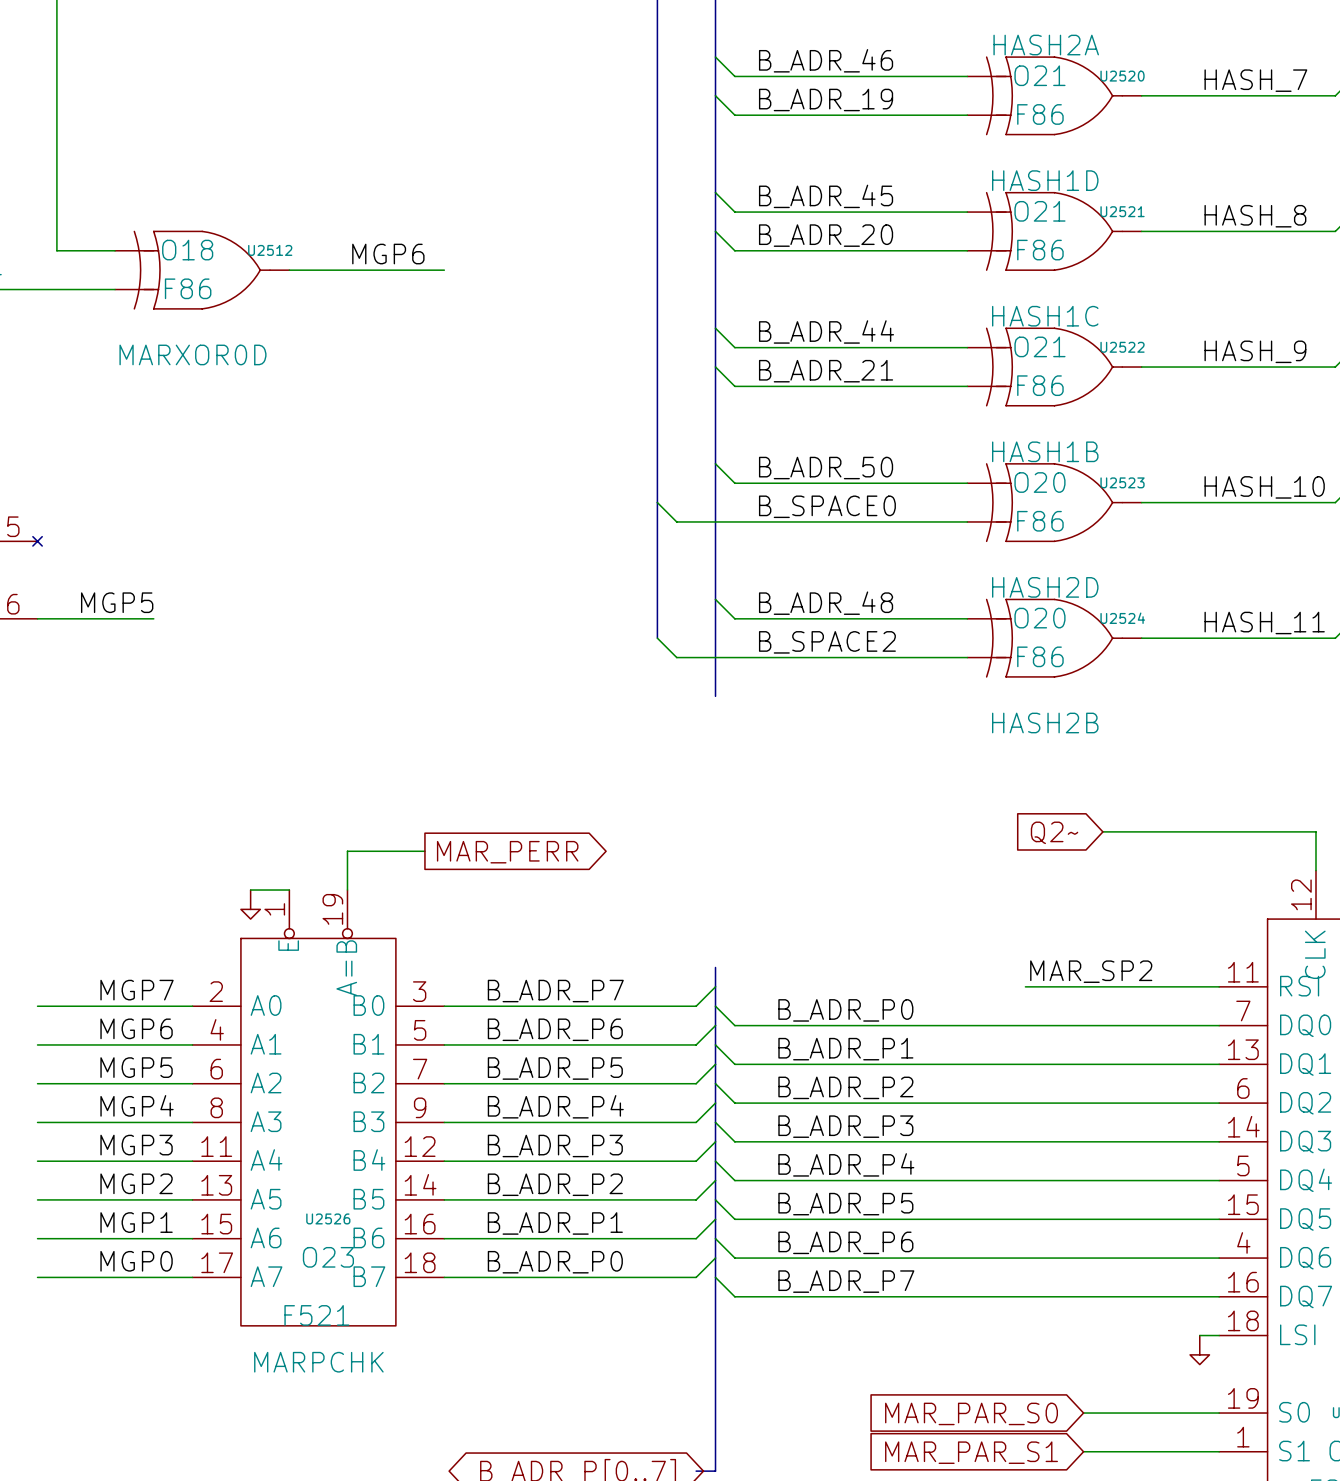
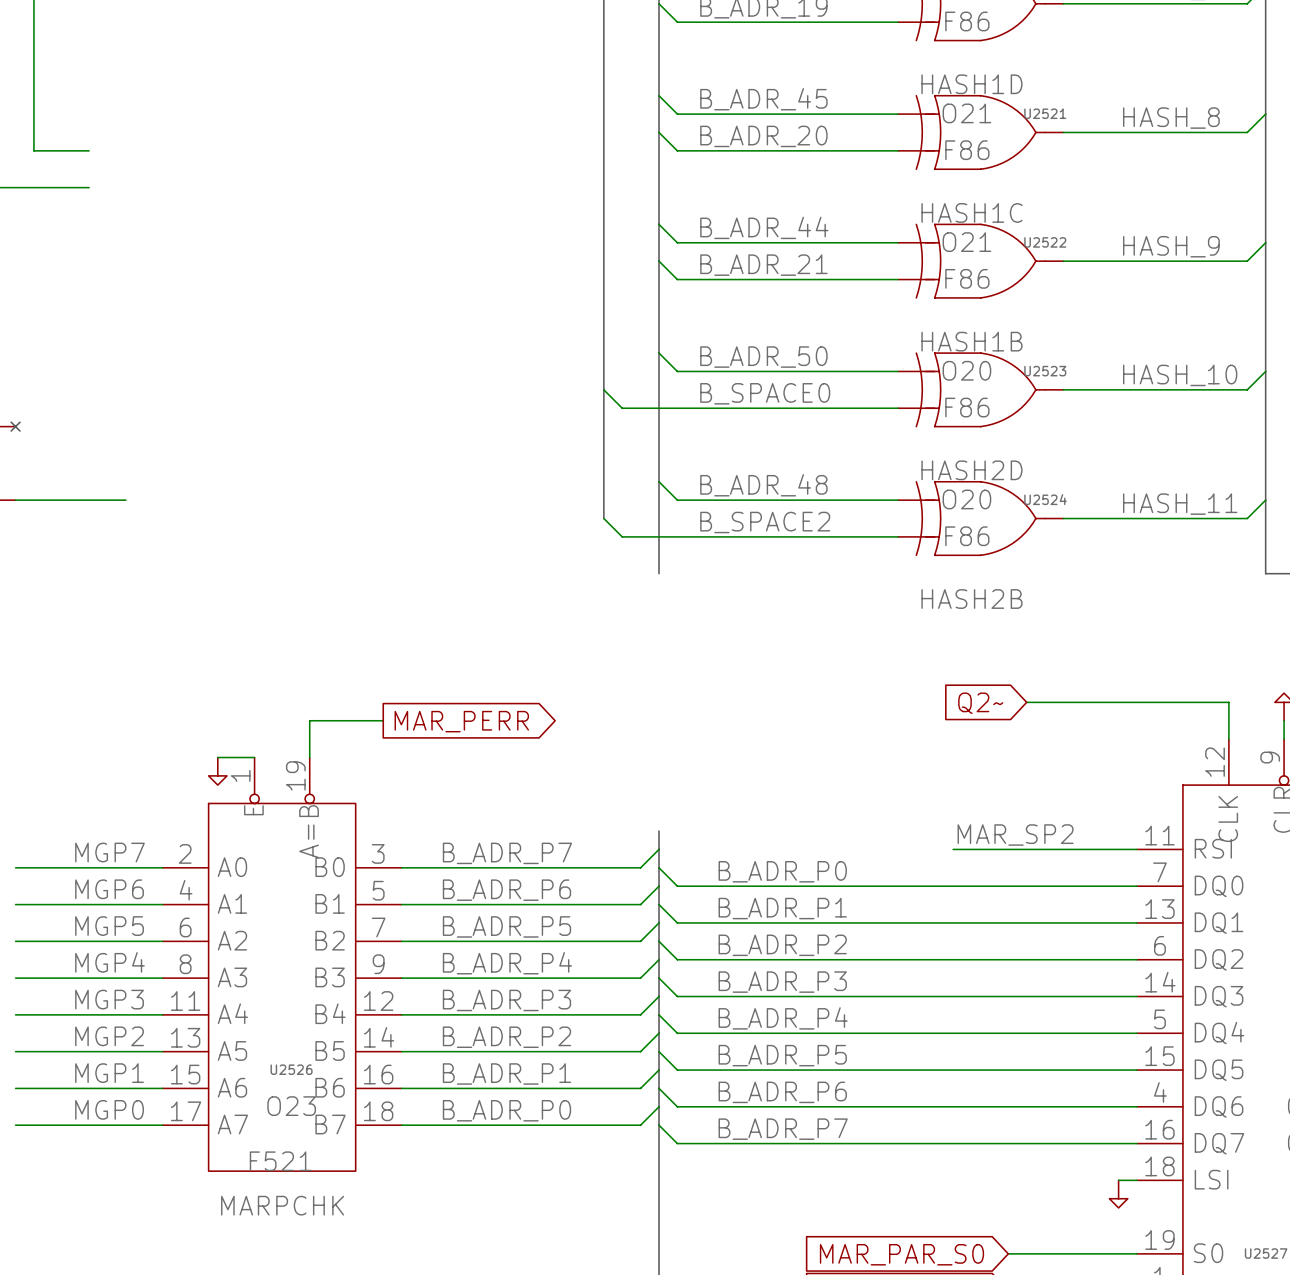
label: MGP6 (388, 254) -> none
U2512: F86 (202, 270) -> none
wire: (289, 270) (444, 270) -> none
label: MGP5 (117, 602) -> none

